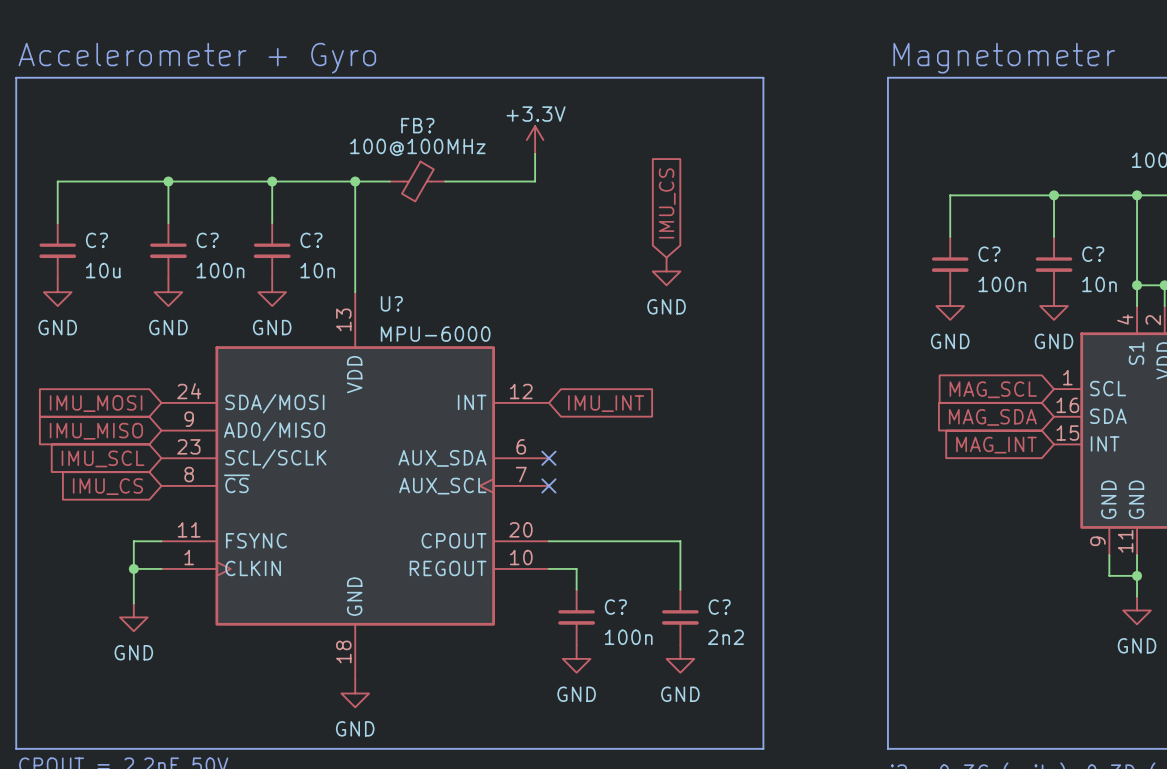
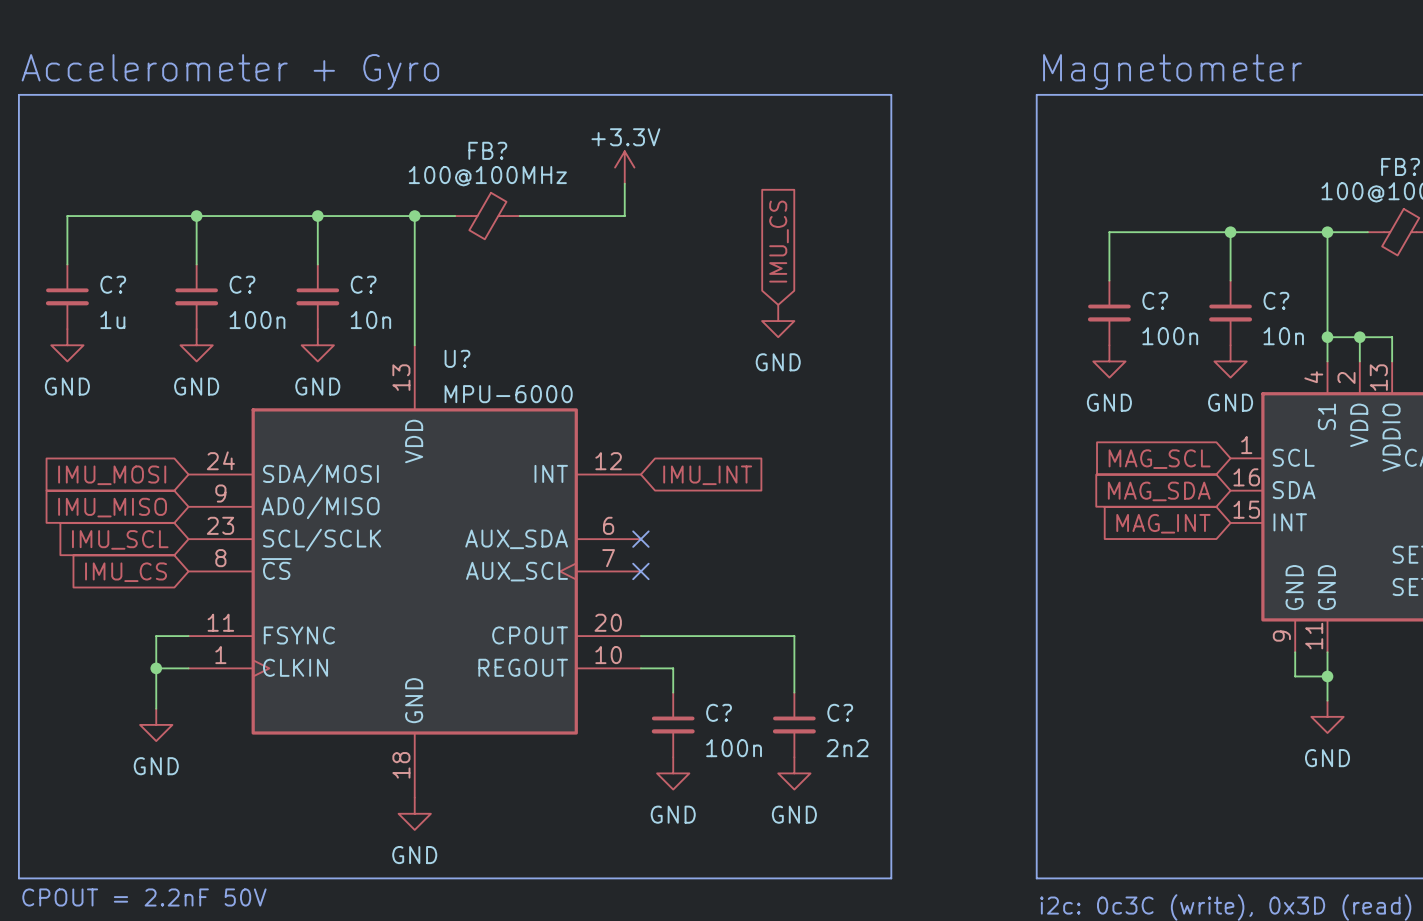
C? value: 10u (103, 270) -> 1u (112, 320)

